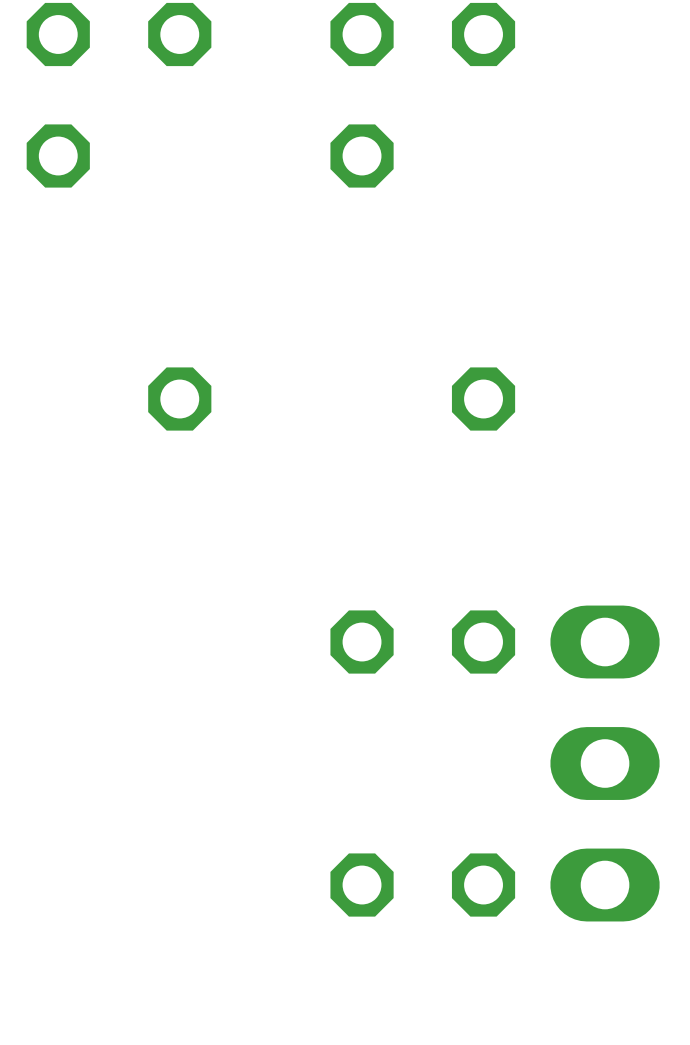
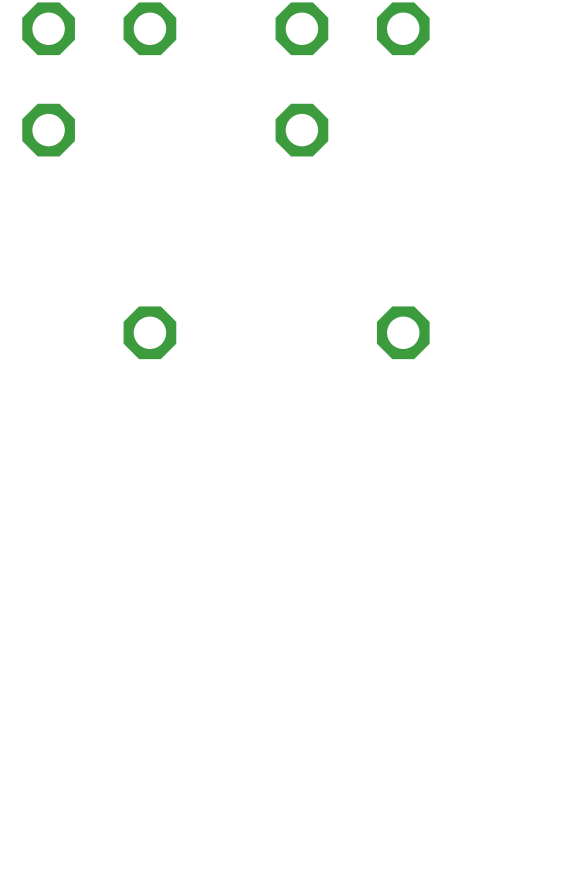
part: (422, 642) -> none
part: (605, 763) -> none
part: (422, 885) -> none

